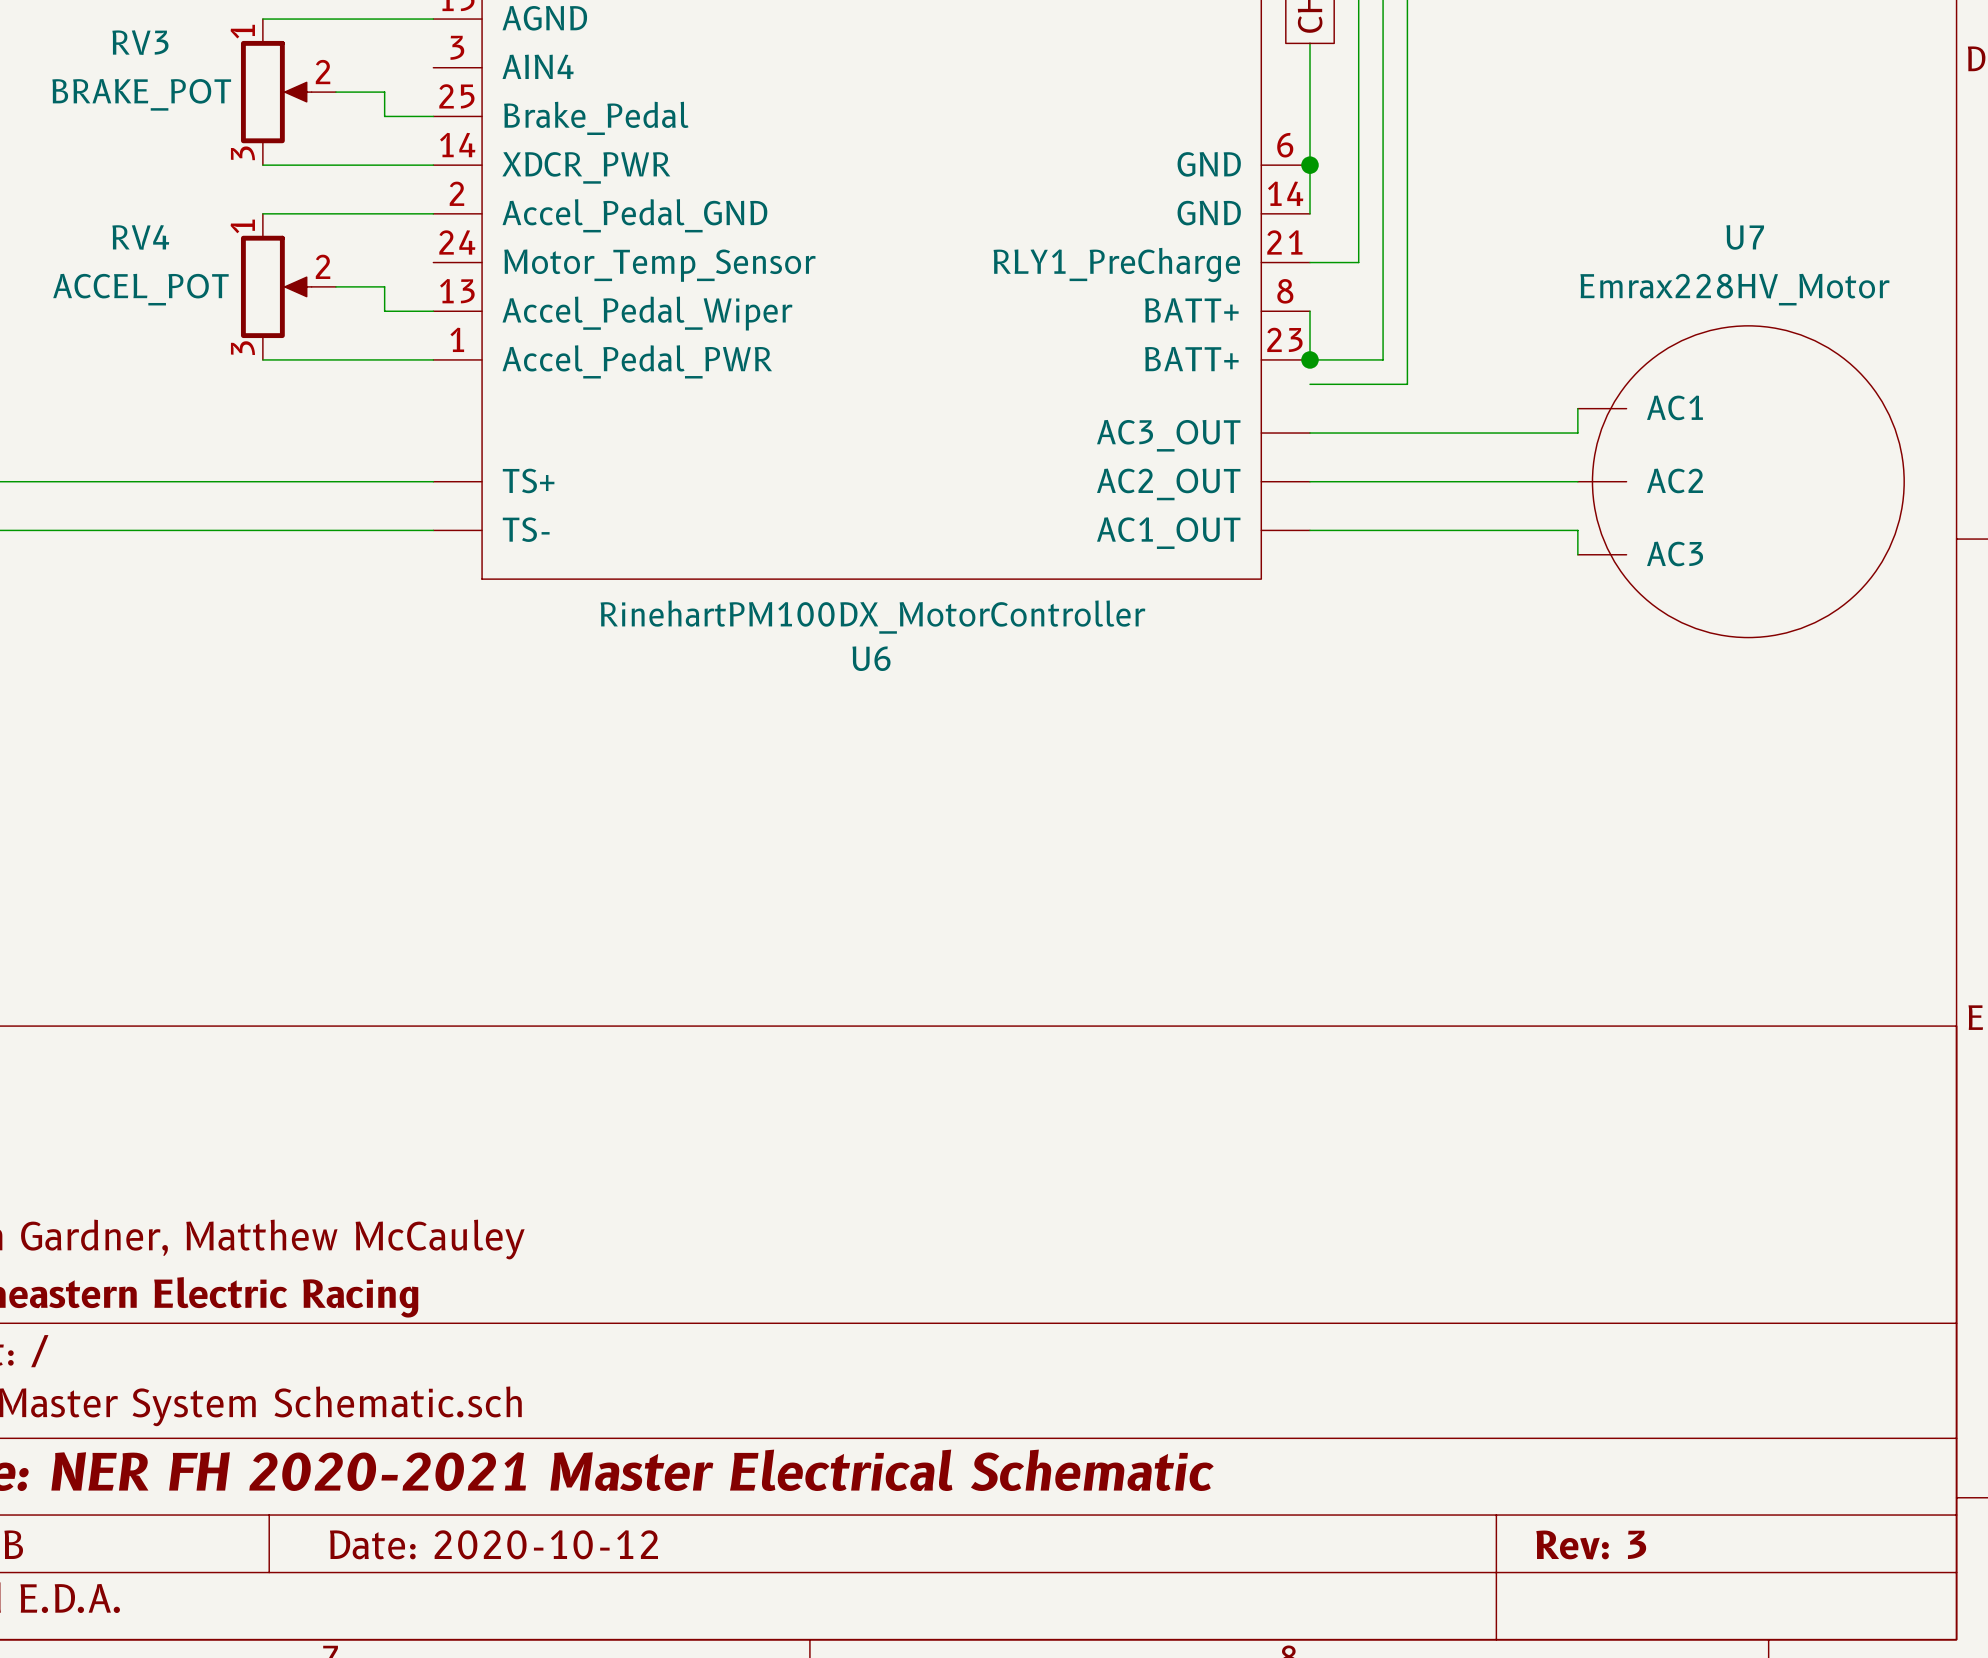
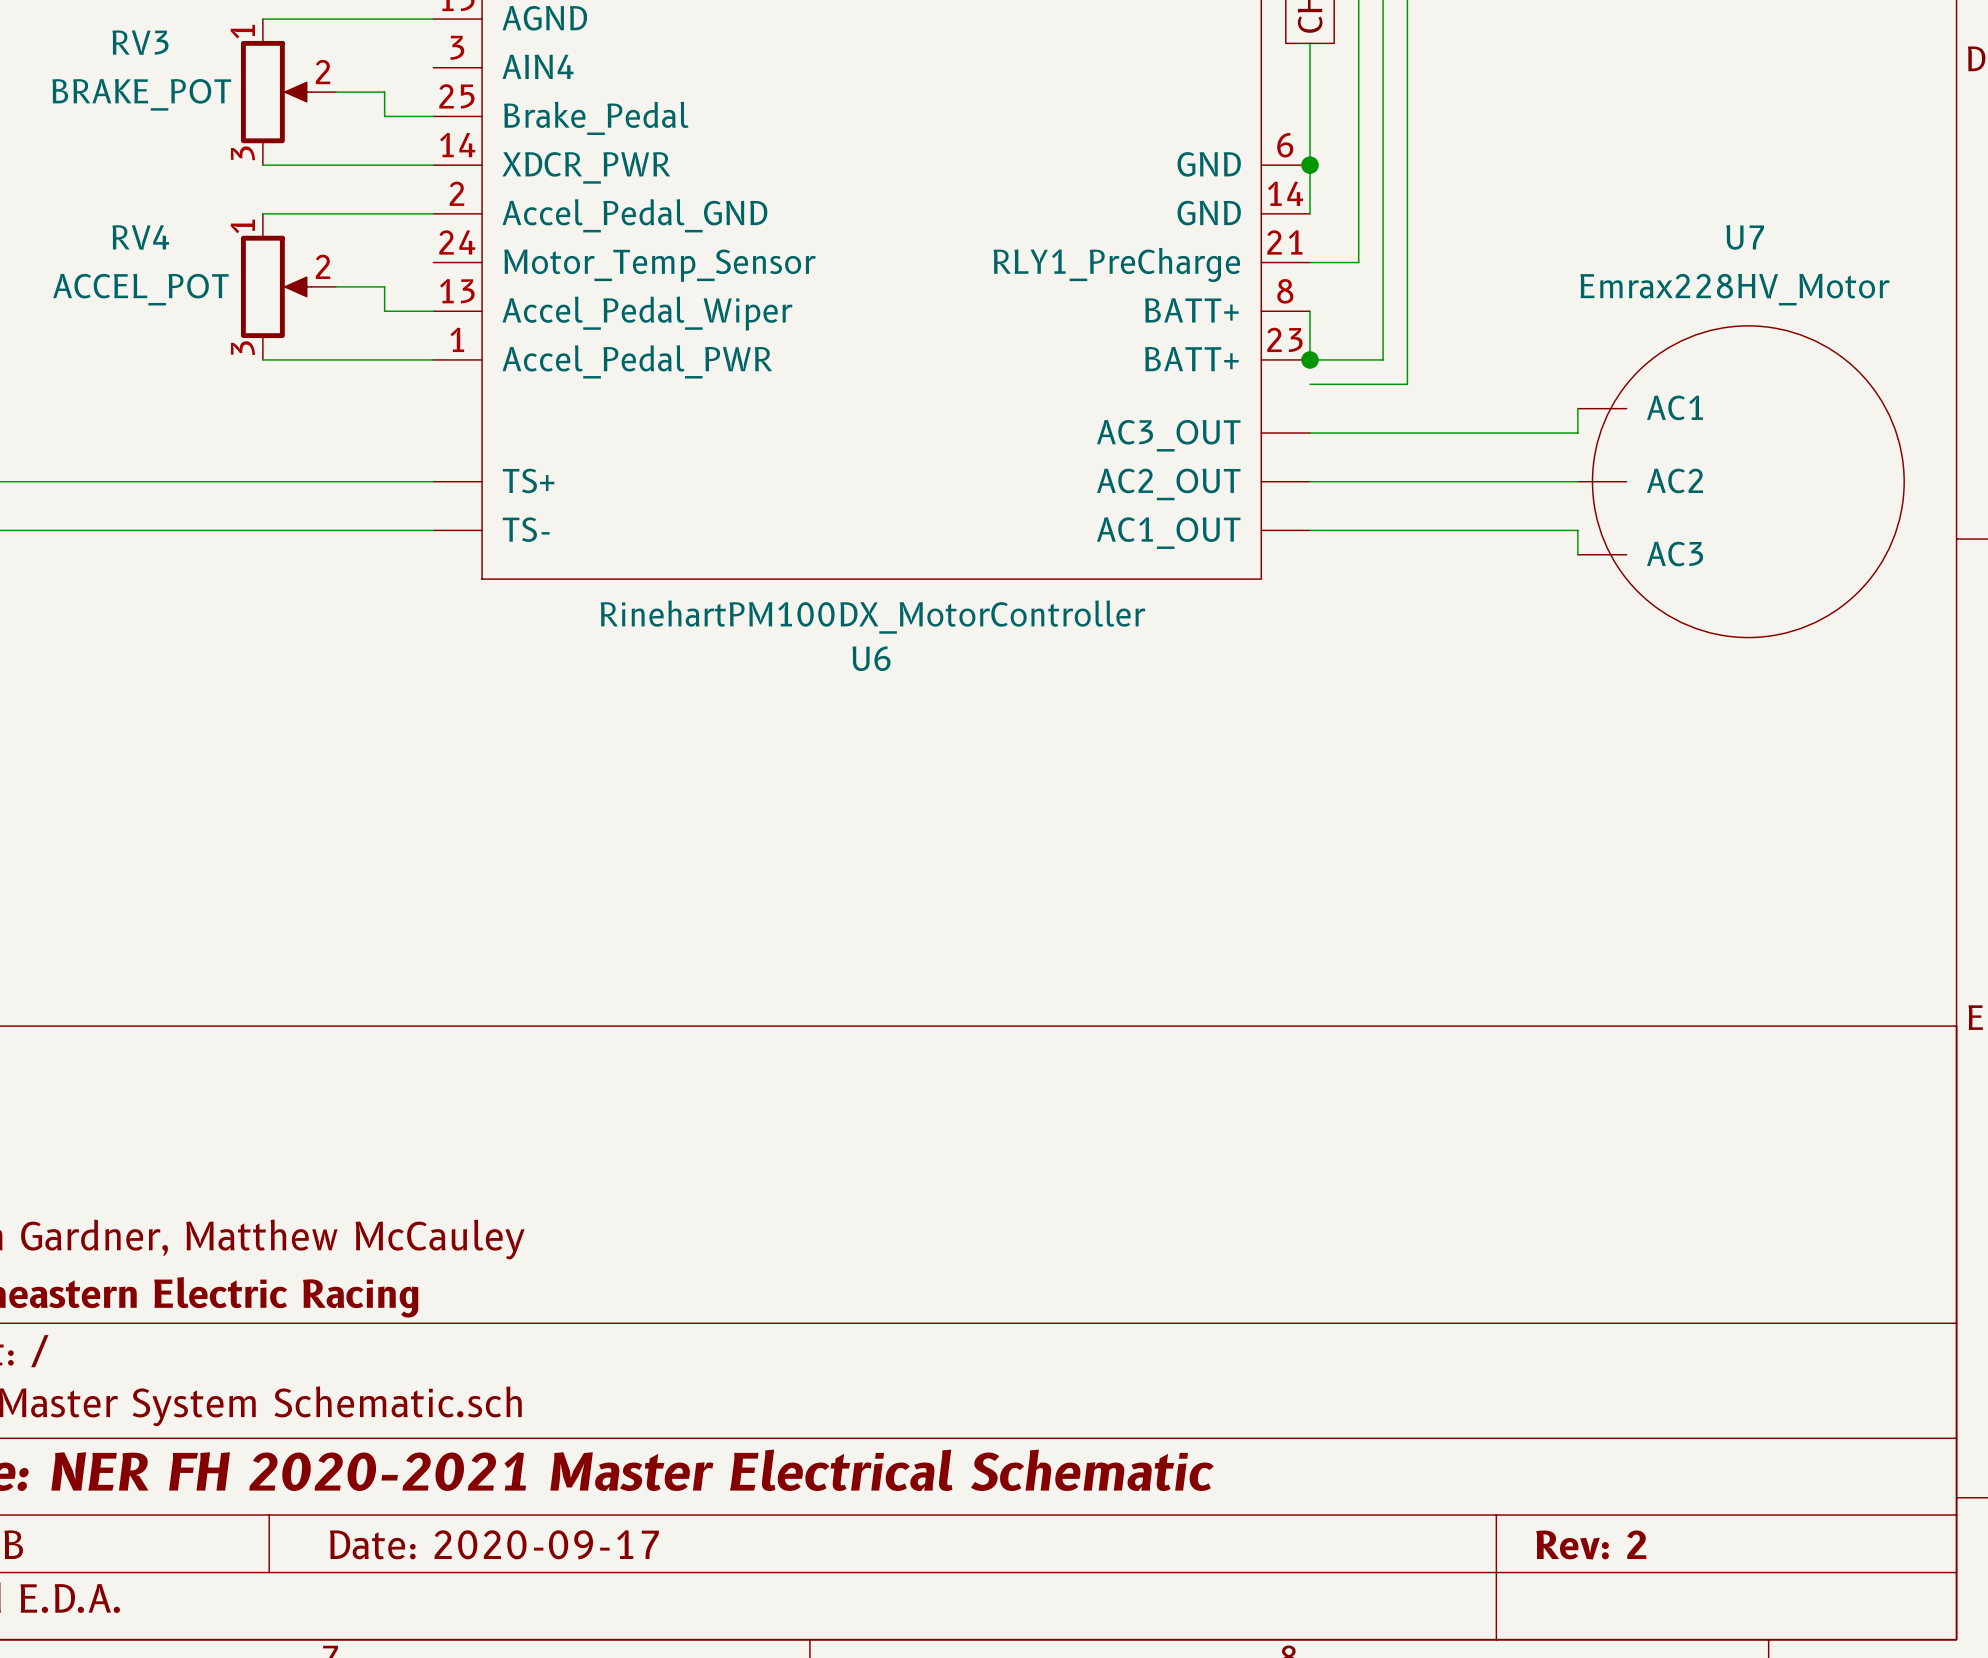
title block: Date: 2020-10-12 (493, 1544) -> Date: 2020-09-17 (494, 1544)
title block: Rev: 3 (1591, 1545) -> Rev: 2 (1591, 1544)

